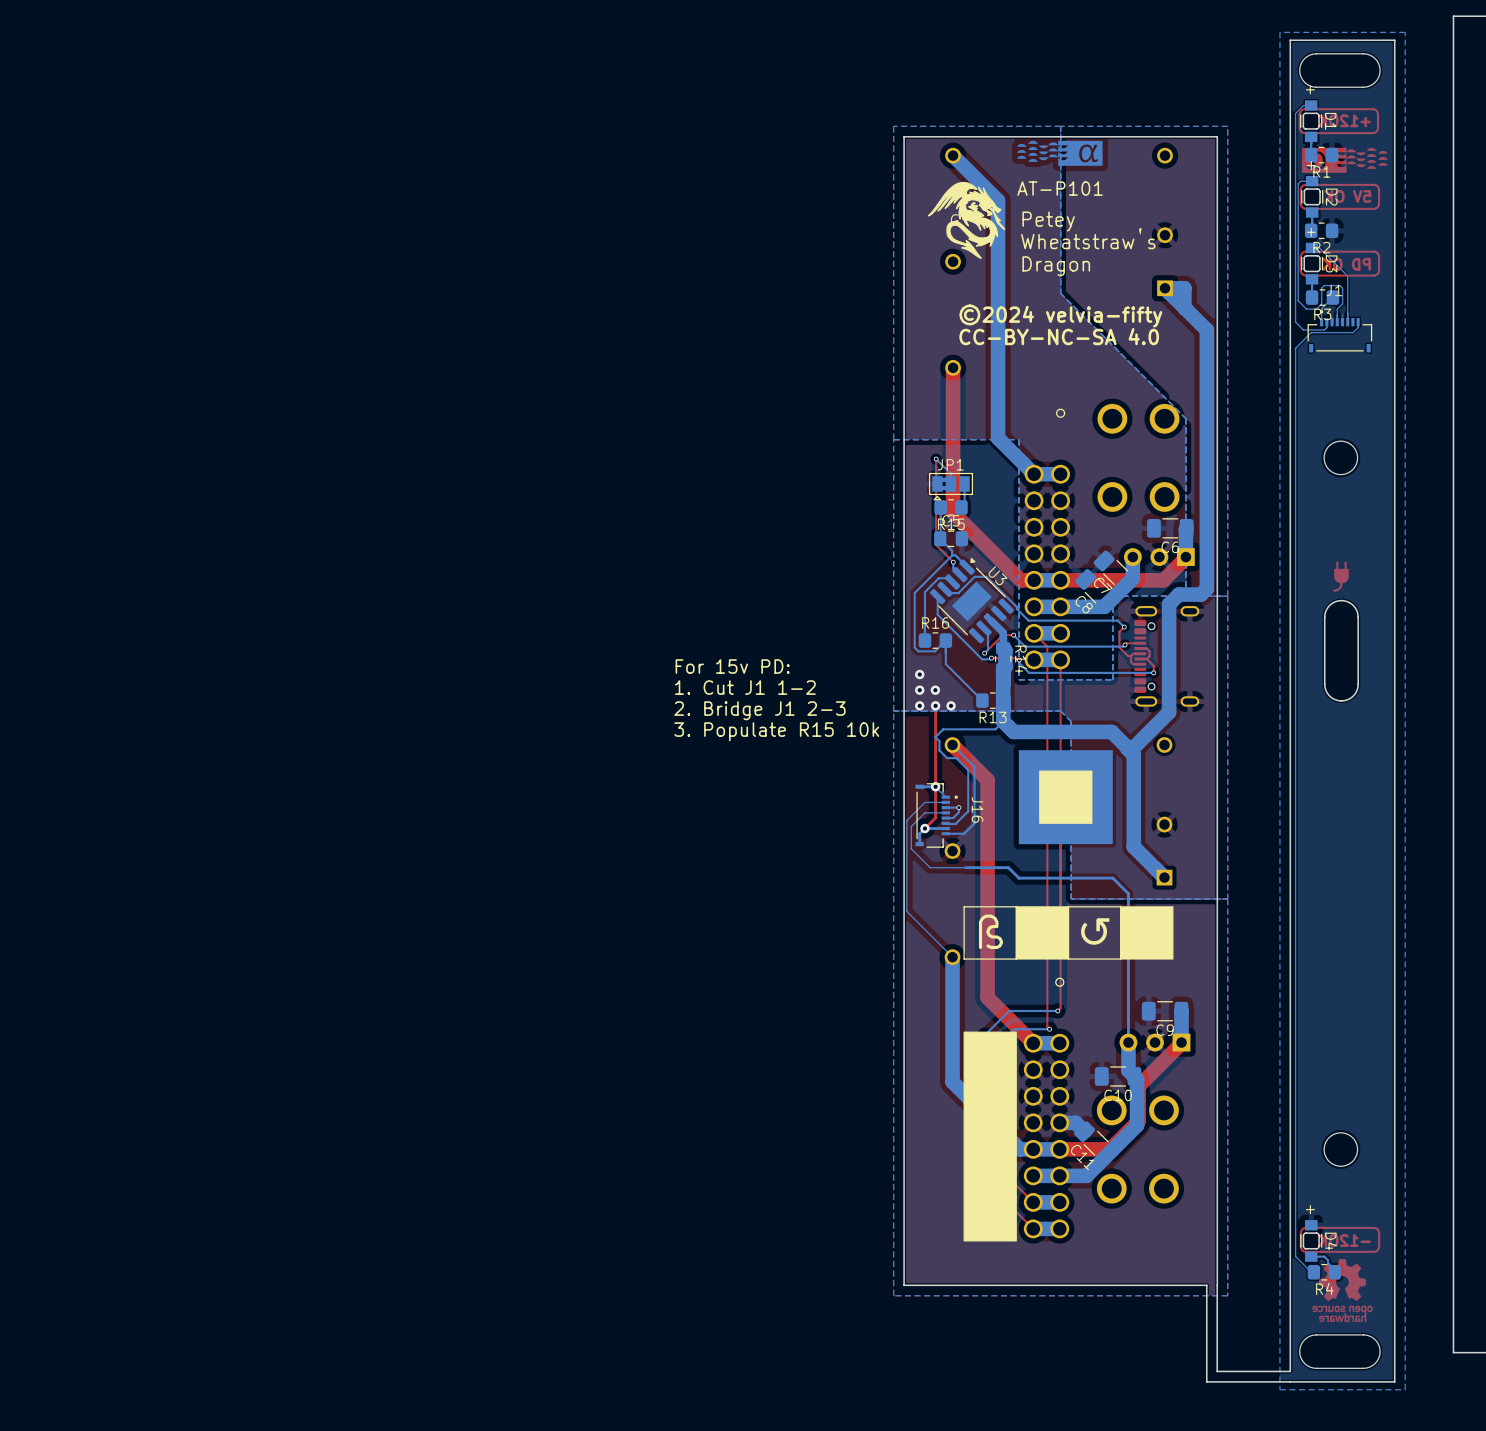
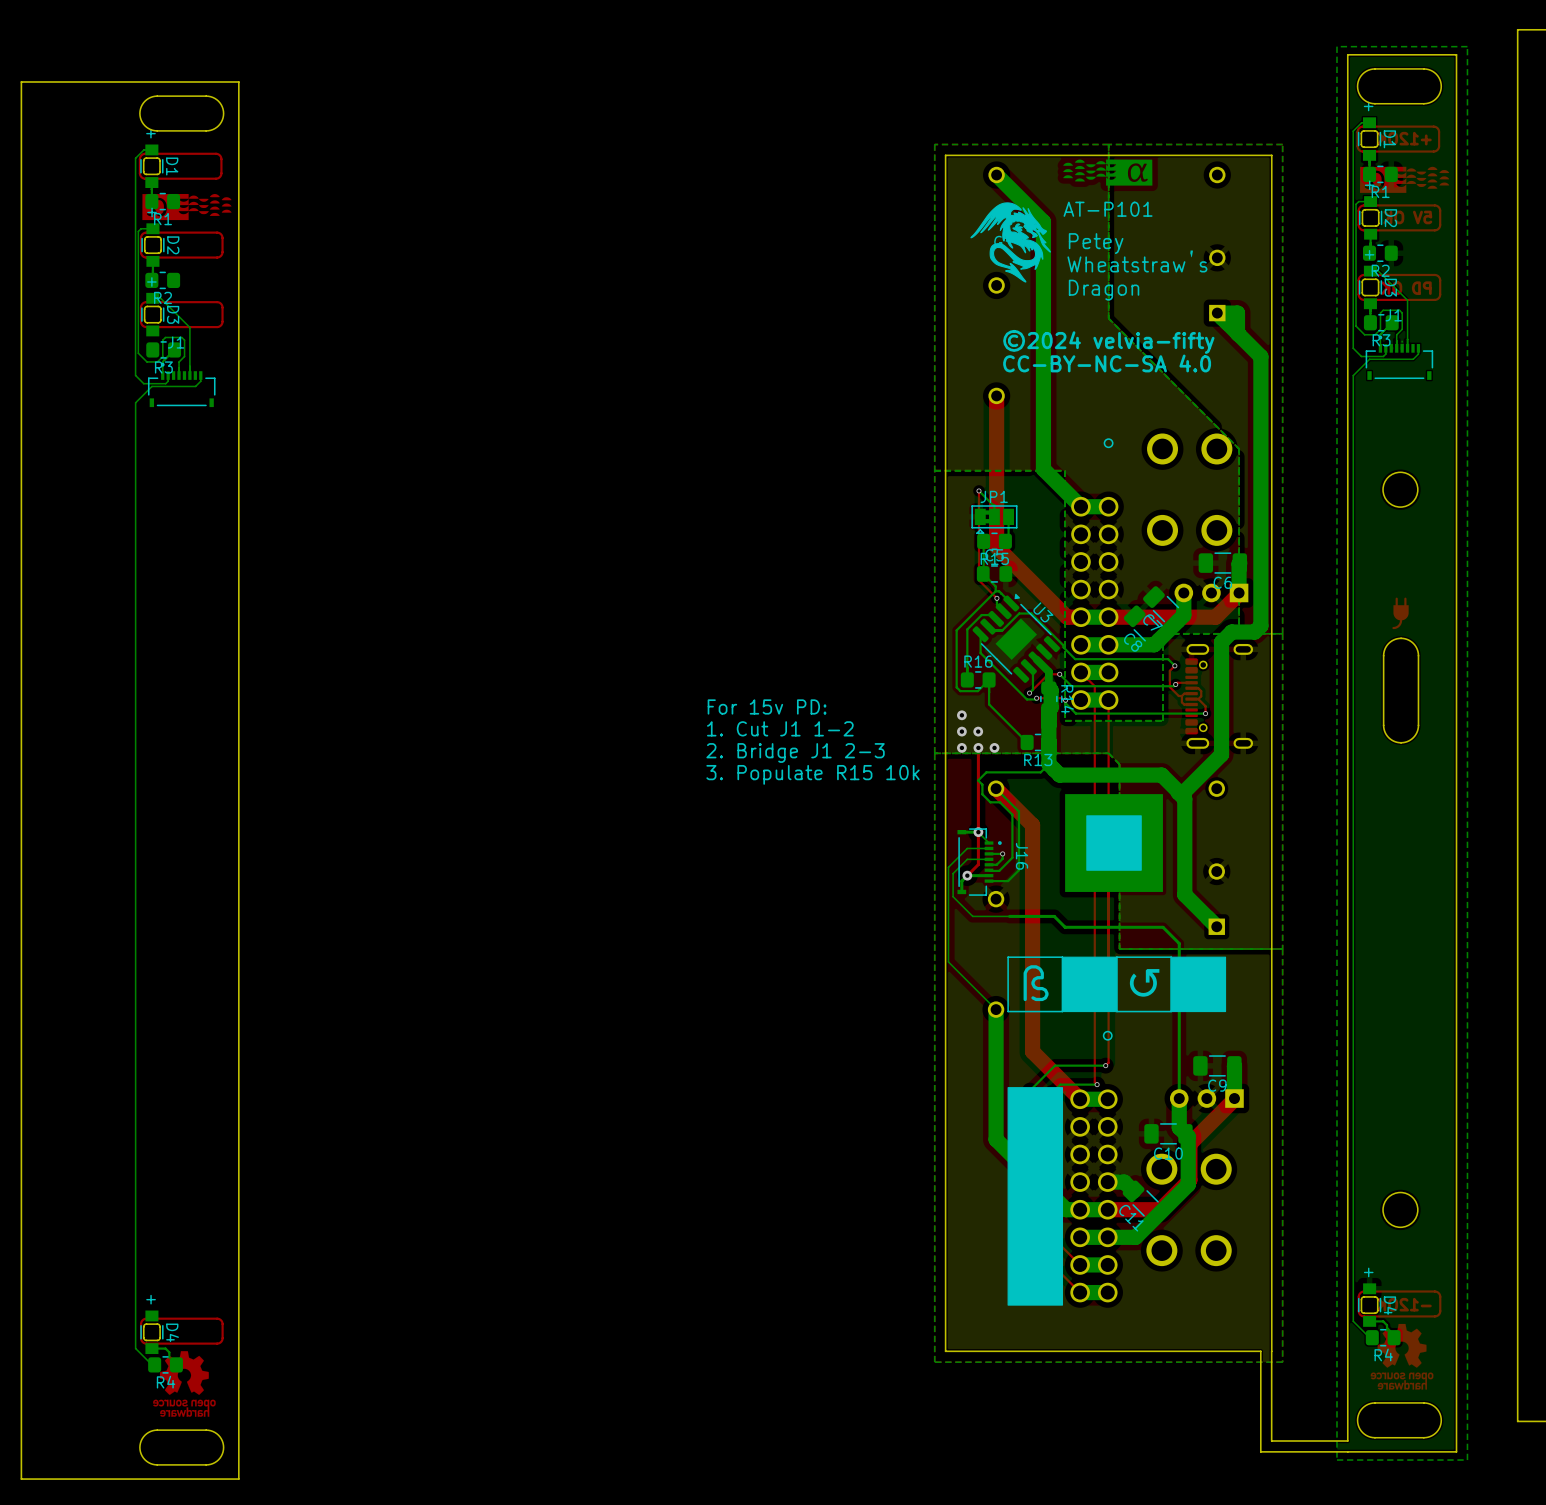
board edge: none -> (238, 81) (238, 1479) (21, 1479) (21, 81) (238, 81)
board edge: none -> (206, 96) (150, 97) (141, 106) (141, 120) (146, 127) (155, 130) (212, 129) (221, 122) (223, 111) (218, 101) (206, 96)
bottom track: none -> (151, 149) (143, 149) (135, 158) (135, 375) (143, 383) (165, 383) (168, 381) (168, 375)
top track: none -> (216, 153) (144, 153) (140, 158) (140, 174) (145, 178) (217, 178) (221, 174) (221, 159) (219, 155) (216, 153)
D1: none -> (151, 166)
drawing: none -> [142, 193, 232, 221]
R1: none -> (162, 201)
bottom track: none -> (152, 228) (141, 228) (138, 231) (138, 353) (146, 361) (157, 361) (162, 356) (162, 340) (165, 337) (181, 337) (184, 340) (184, 356) (179, 362) (179, 375)
top track: none -> (217, 232) (145, 232) (141, 236) (141, 253) (146, 257) (218, 257) (222, 253) (222, 238) (220, 234) (217, 232)
D2: none -> (152, 245)
R2: none -> (162, 280)
bottom track: none -> (152, 298) (160, 298) (189, 327) (189, 375)
top track: none -> (217, 302) (145, 302) (141, 306) (141, 322) (146, 327) (218, 326) (222, 323) (222, 307) (220, 303) (217, 302)
D3: none -> (152, 314)
R3: none -> (163, 349)
bottom track: none -> (200, 375) (200, 381) (195, 386) (151, 386) (135, 402) (135, 1348) (152, 1364) (154, 1364)
J1: none -> (181, 385)
top track: none -> (217, 1318) (145, 1318) (141, 1323) (141, 1339) (146, 1343) (218, 1343) (222, 1339) (222, 1324) (221, 1320) (217, 1318)
D4: none -> (151, 1332)
bottom track: none -> (151, 1348) (165, 1348) (169, 1352) (169, 1357)
drawing: none -> [153, 1351, 216, 1417]
R4: none -> (165, 1364)
board edge: none -> (206, 1430) (150, 1431) (141, 1440) (141, 1454) (146, 1461) (155, 1464) (212, 1463) (221, 1456) (223, 1445) (218, 1435) (206, 1430)

